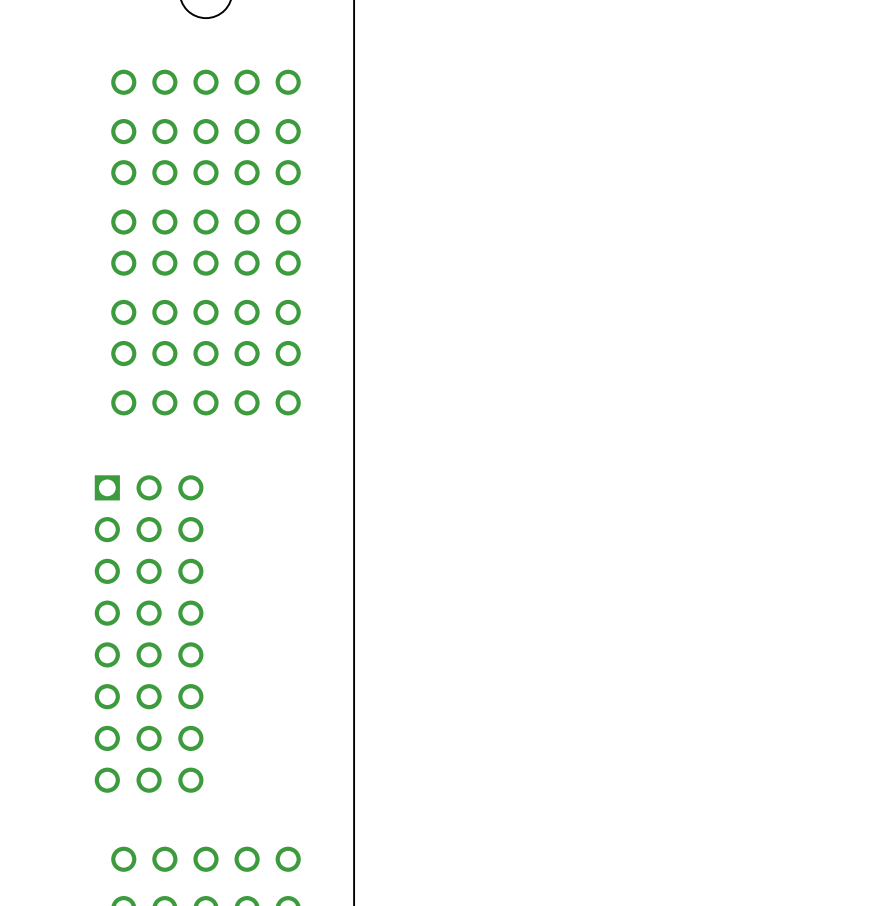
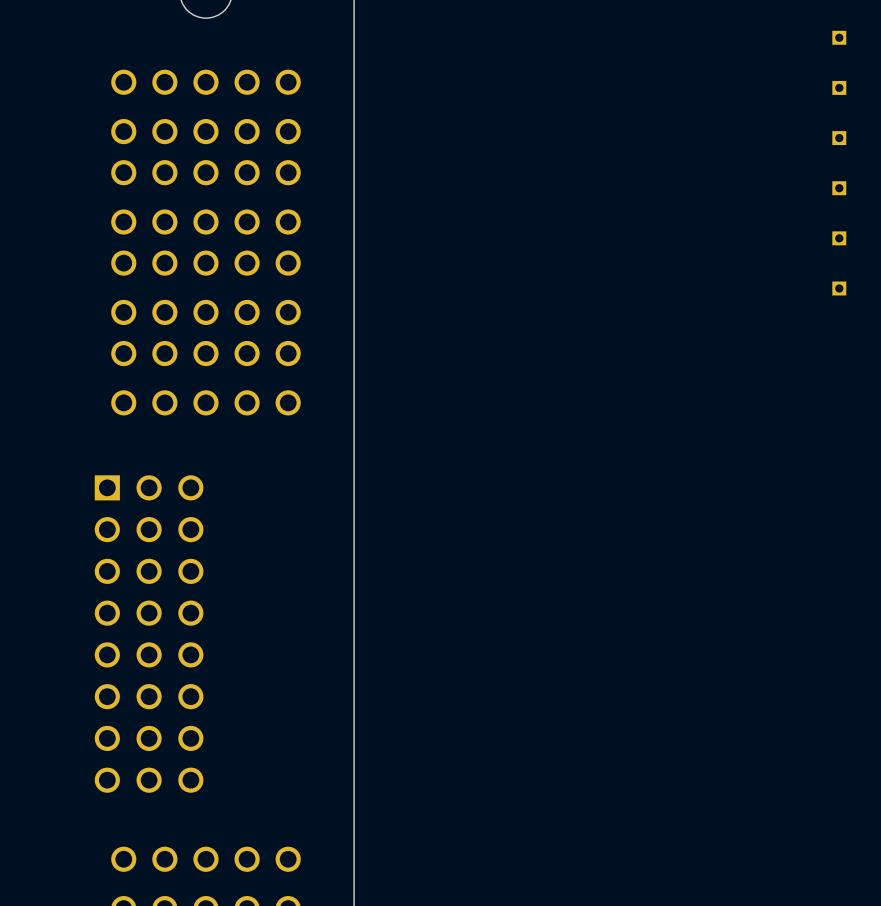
part: none -> (839, 37)
part: none -> (839, 87)
part: none -> (839, 138)
part: none -> (839, 188)
part: none -> (839, 238)
part: none -> (839, 288)

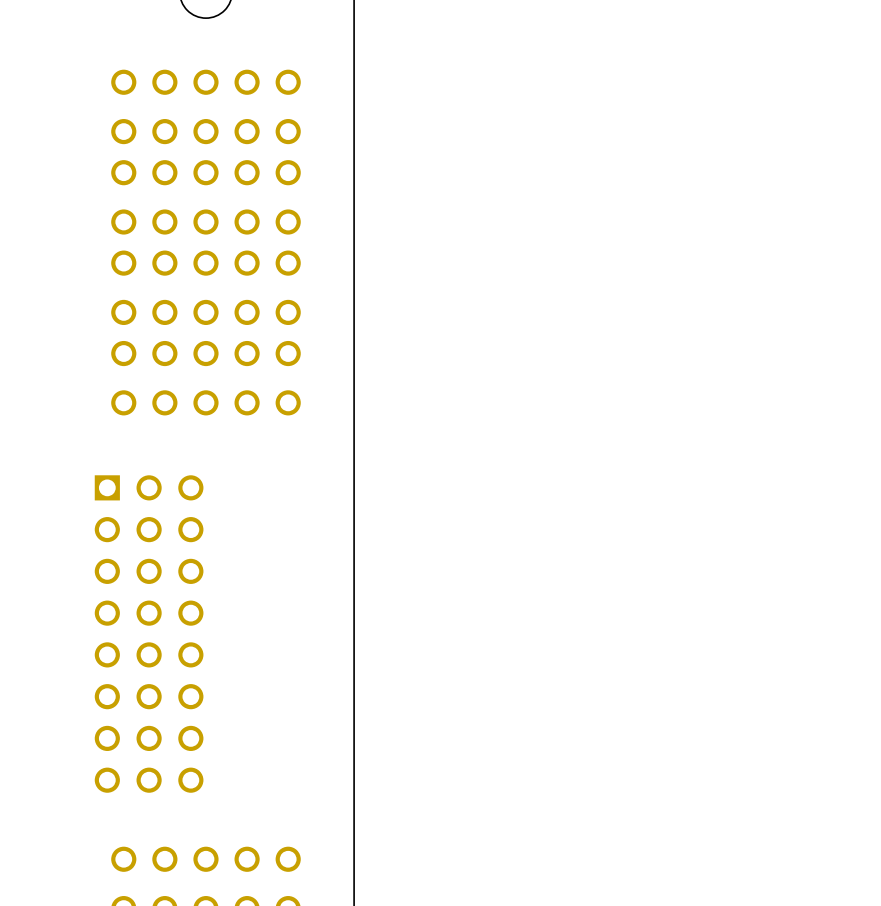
part: (839, 37) -> none
part: (839, 87) -> none
part: (839, 138) -> none
part: (839, 188) -> none
part: (839, 238) -> none
part: (839, 288) -> none

